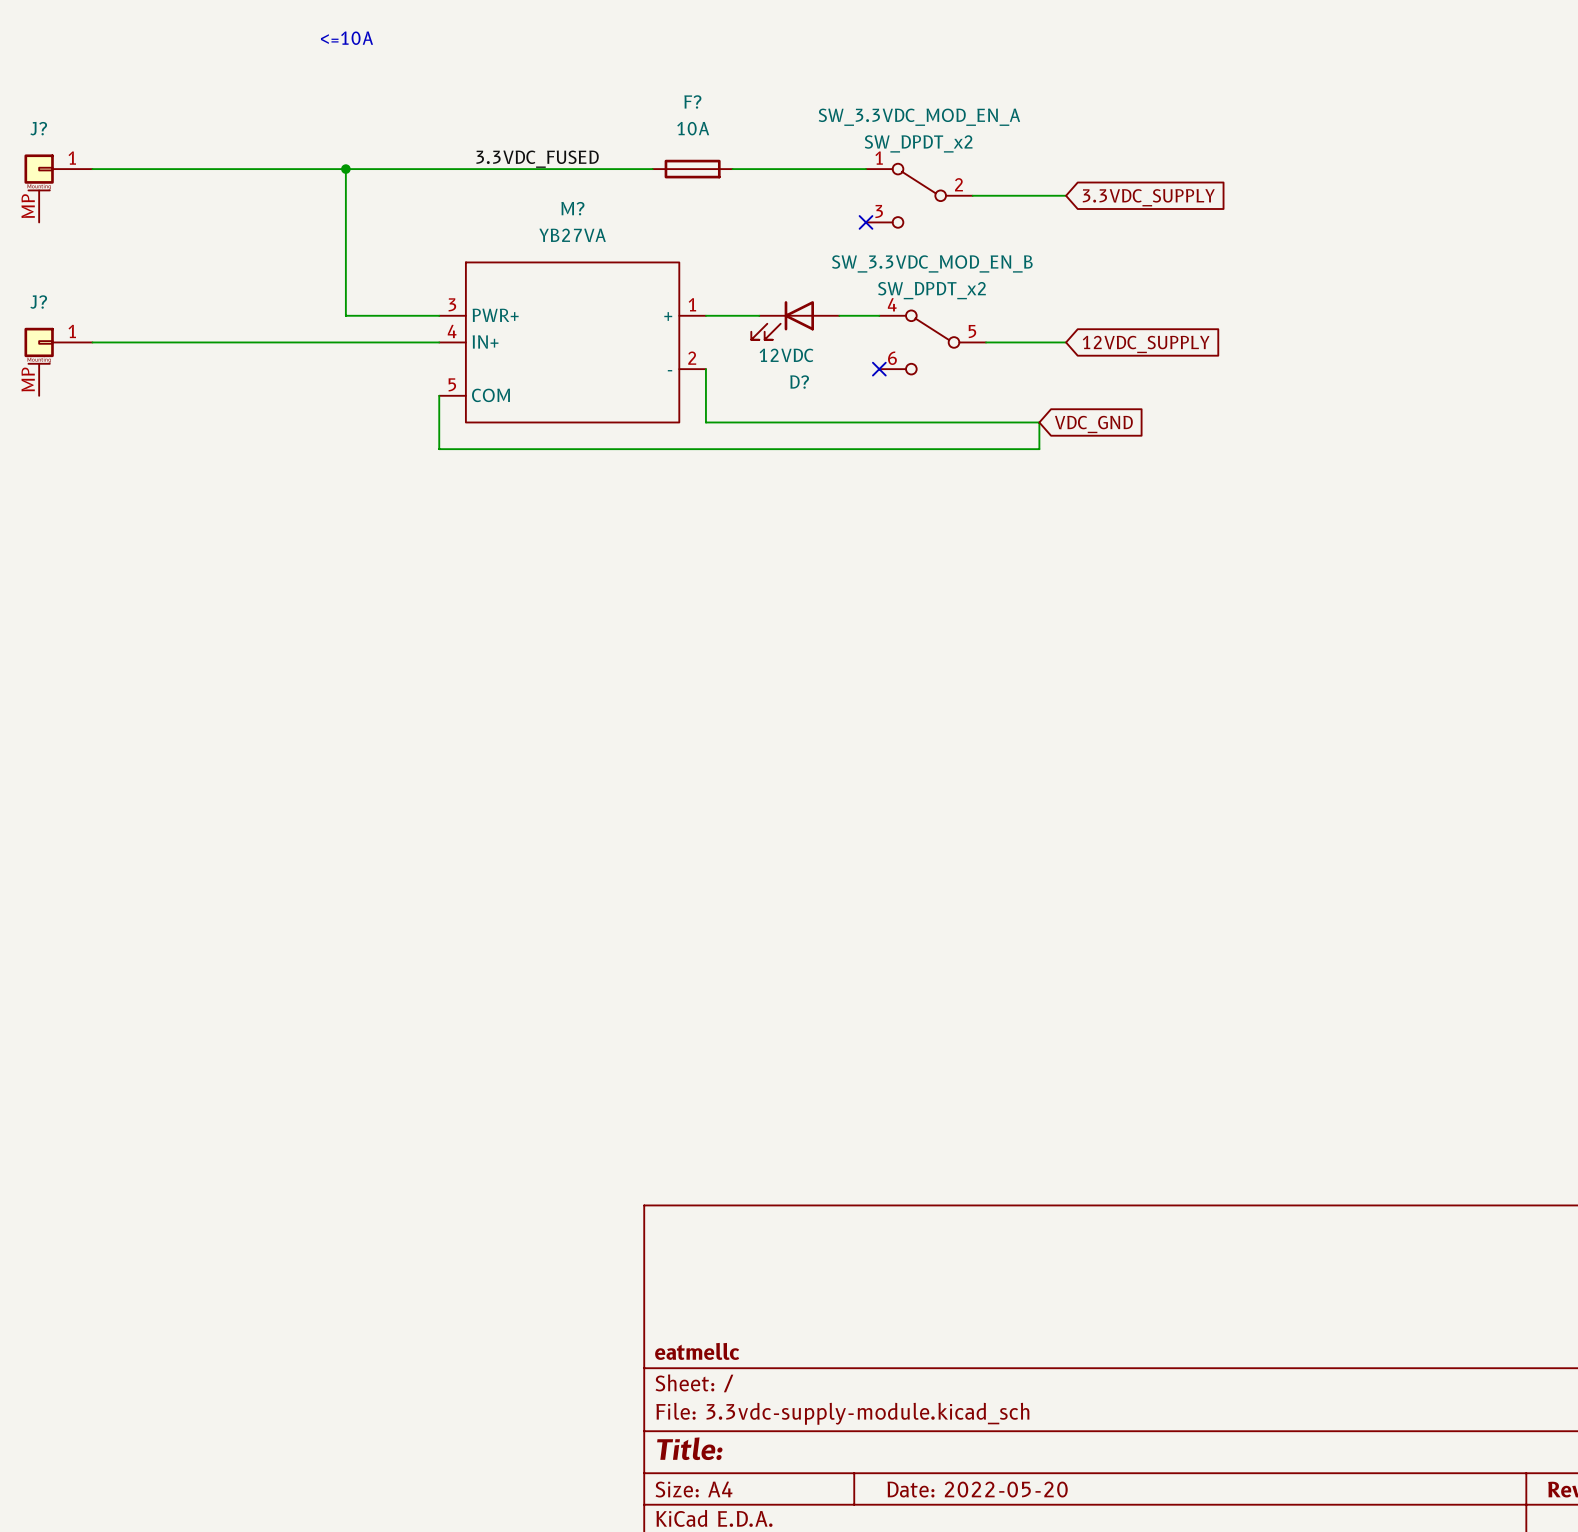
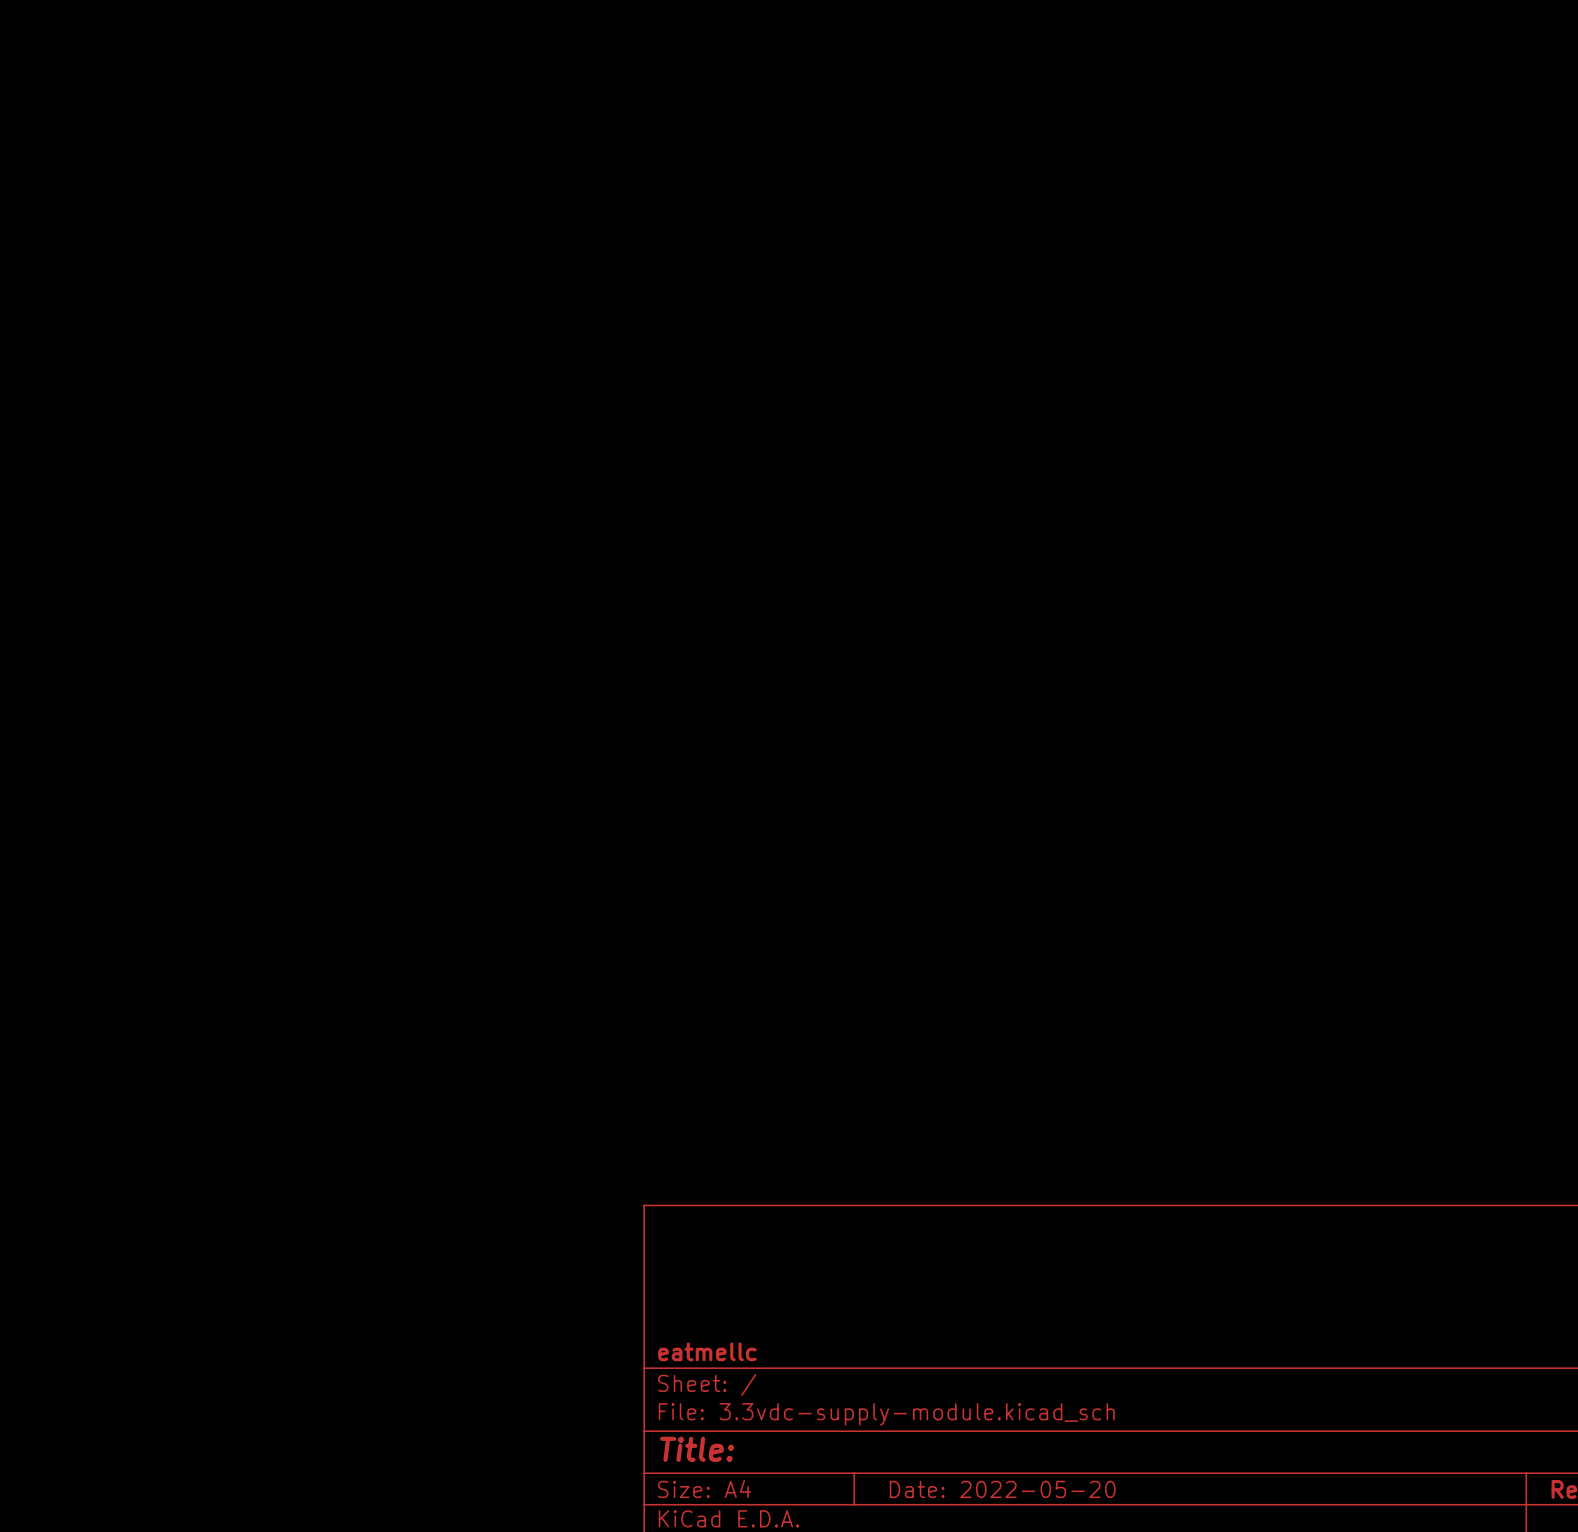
text: <=10A (347, 38) -> none
label: 3.3VDC_FUSED (537, 159) -> none
wire: (92, 169) (652, 169) -> none
wire: (345, 169) (345, 315) (439, 315) -> none
junction: (345, 169) -> none
F?: 10A (692, 169) -> none
wire: (732, 169) (866, 169) -> none
J?: (58, 188) -> none
SW_3.3VDC_MOD_EN_A: SW_DPDT_x2 (919, 195) -> none
wire: (972, 195) (1066, 195) -> none
global label: 3.3VDC_SUPPLY (1148, 197) -> none
no-connect mark: (866, 222) -> none
wire: (705, 315) (759, 315) -> none
wire: (839, 315) (879, 315) -> none
D?: 12VDC (795, 320) -> none
wire: (92, 342) (439, 342) -> none
M?: YB27VA (572, 342) -> none
SW_3.3VDC_MOD_EN_B: SW_DPDT_x2 (932, 342) -> none
wire: (986, 342) (1066, 342) -> none
global label: 12VDC_SUPPLY (1146, 344) -> none
J?: (58, 361) -> none
wire: (705, 369) (705, 422) (1039, 422) (1039, 449) (439, 449) (439, 395) -> none
no-connect mark: (879, 369) -> none
global label: VDC_GND (1093, 424) -> none

